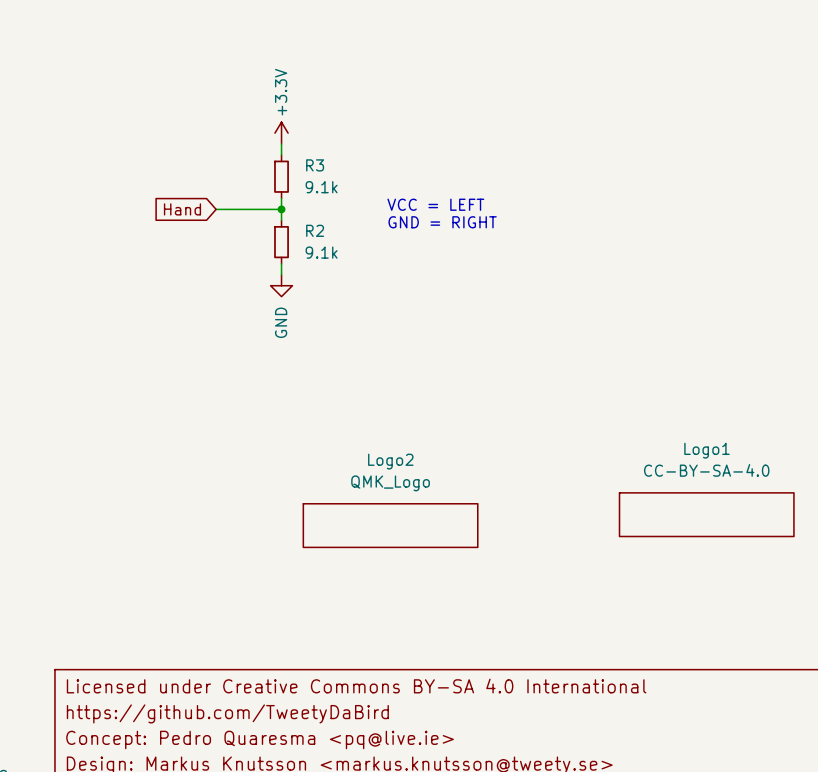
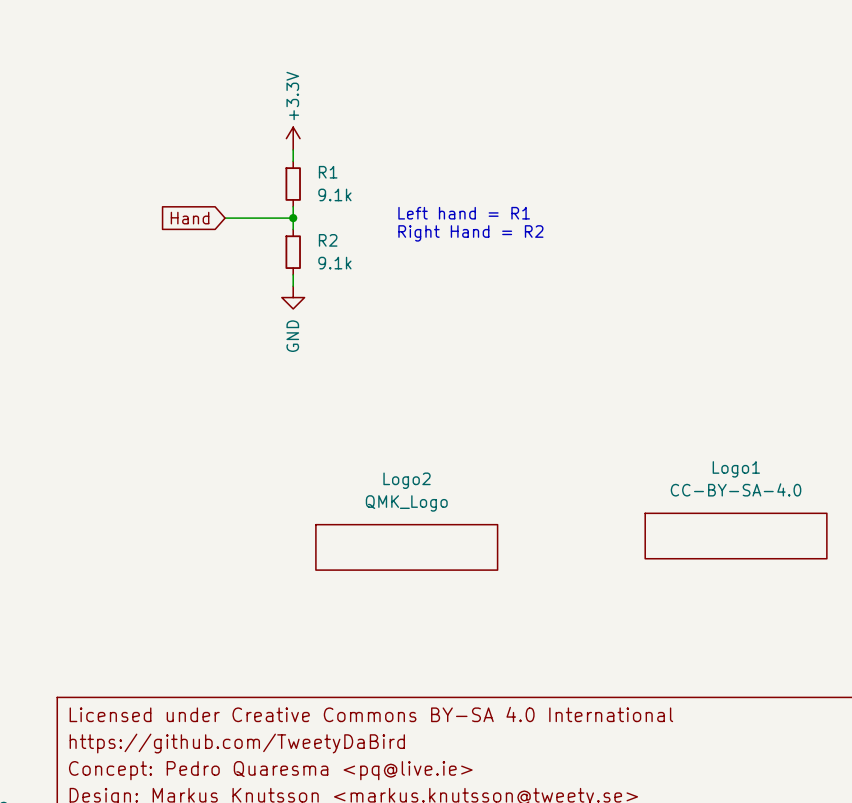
R3 name: R3 (315, 165) -> R1 (328, 172)
text: VCC = LEFT (435, 204) -> Left hand = R1 (464, 213)
text: GND = RIGHT (442, 222) -> Right Hand = R2 (470, 233)

